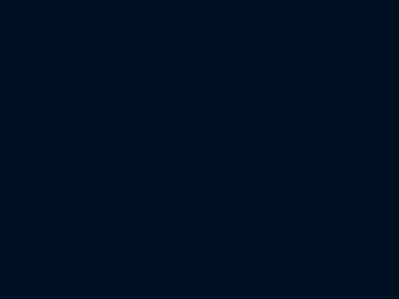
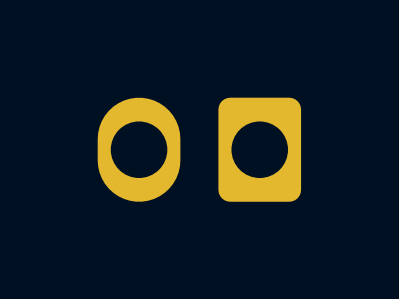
part: none -> (199, 149)

